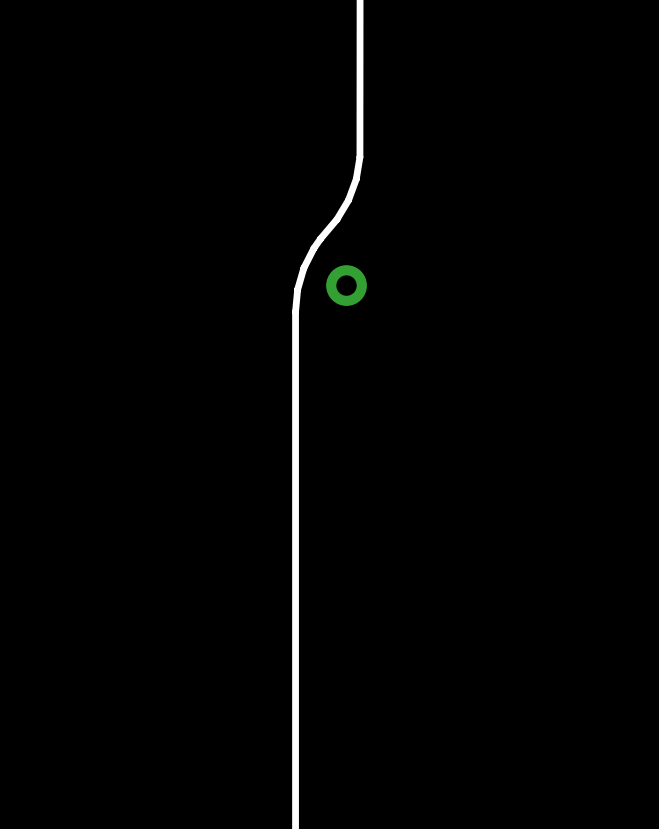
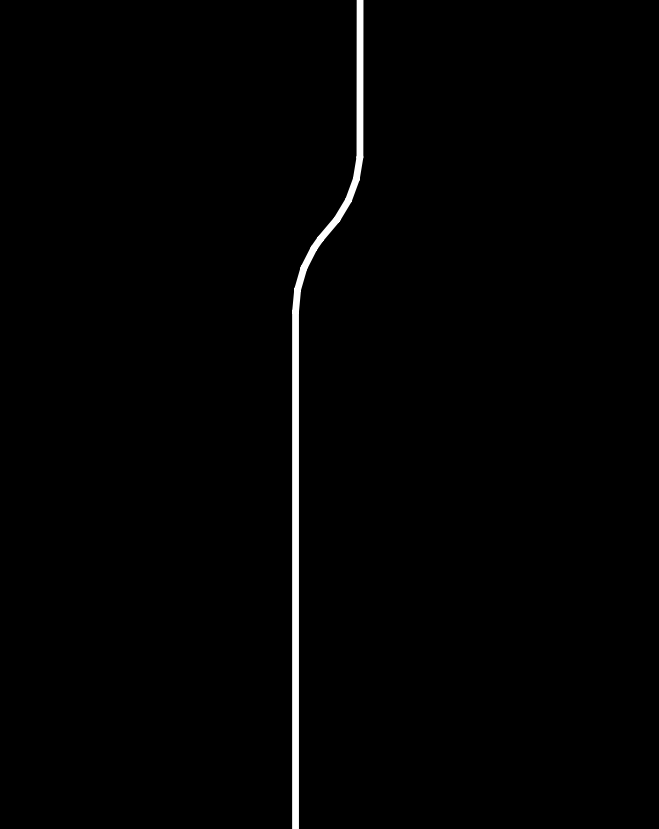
via: (346, 285) -> none

